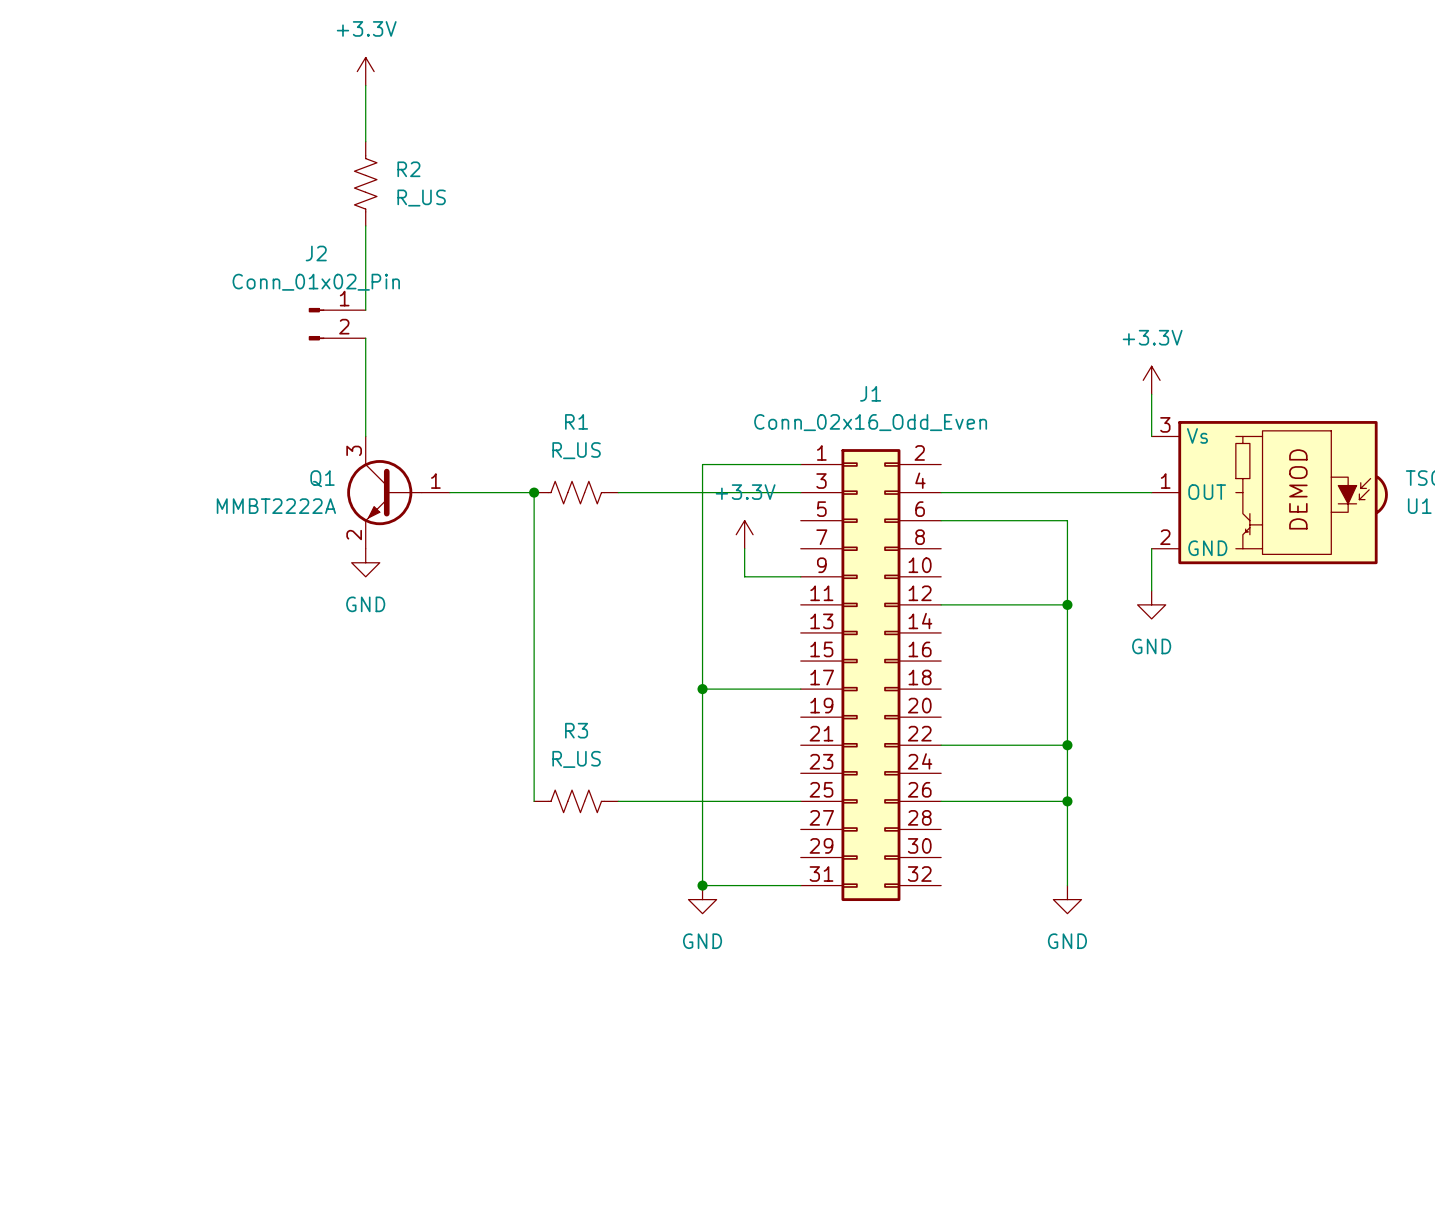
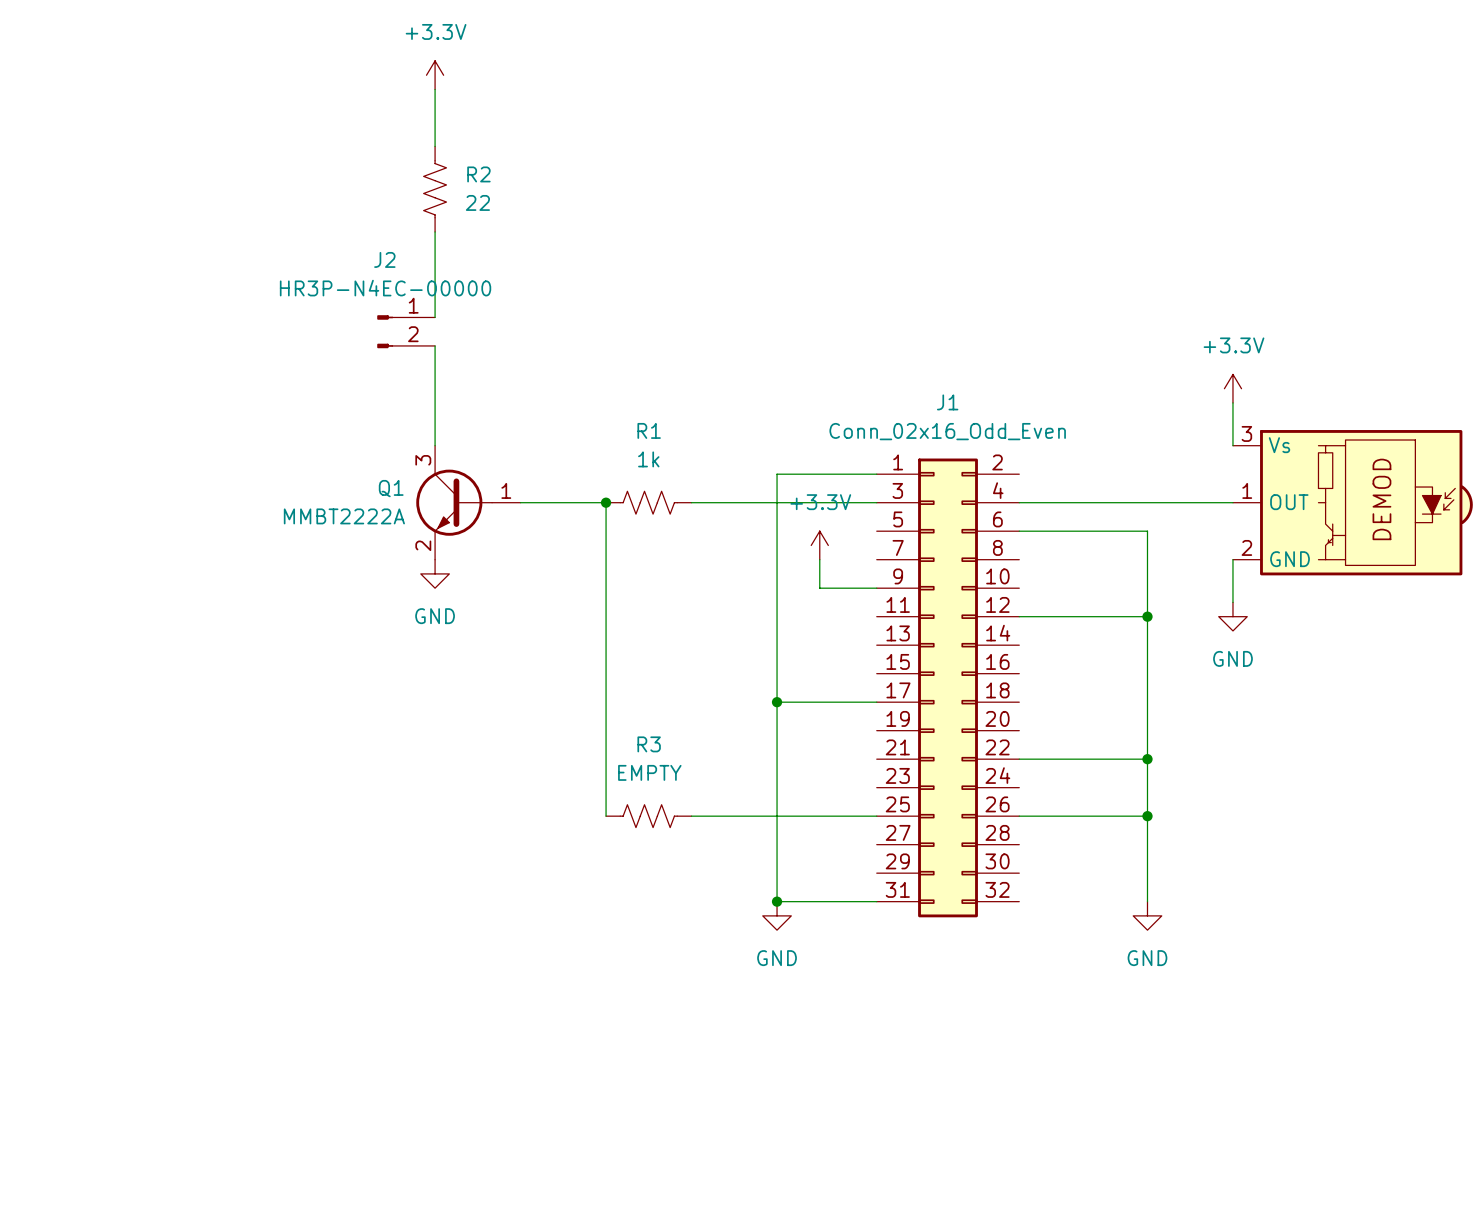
R2 value: R_US (421, 198) -> 22 (477, 202)
J2 value: Conn_01x02_Pin (316, 282) -> HR3P-N4EC-00000 (385, 288)
R1 value: R_US (576, 450) -> 1k (648, 459)
R3 value: R_US (576, 759) -> EMPTY (649, 772)

